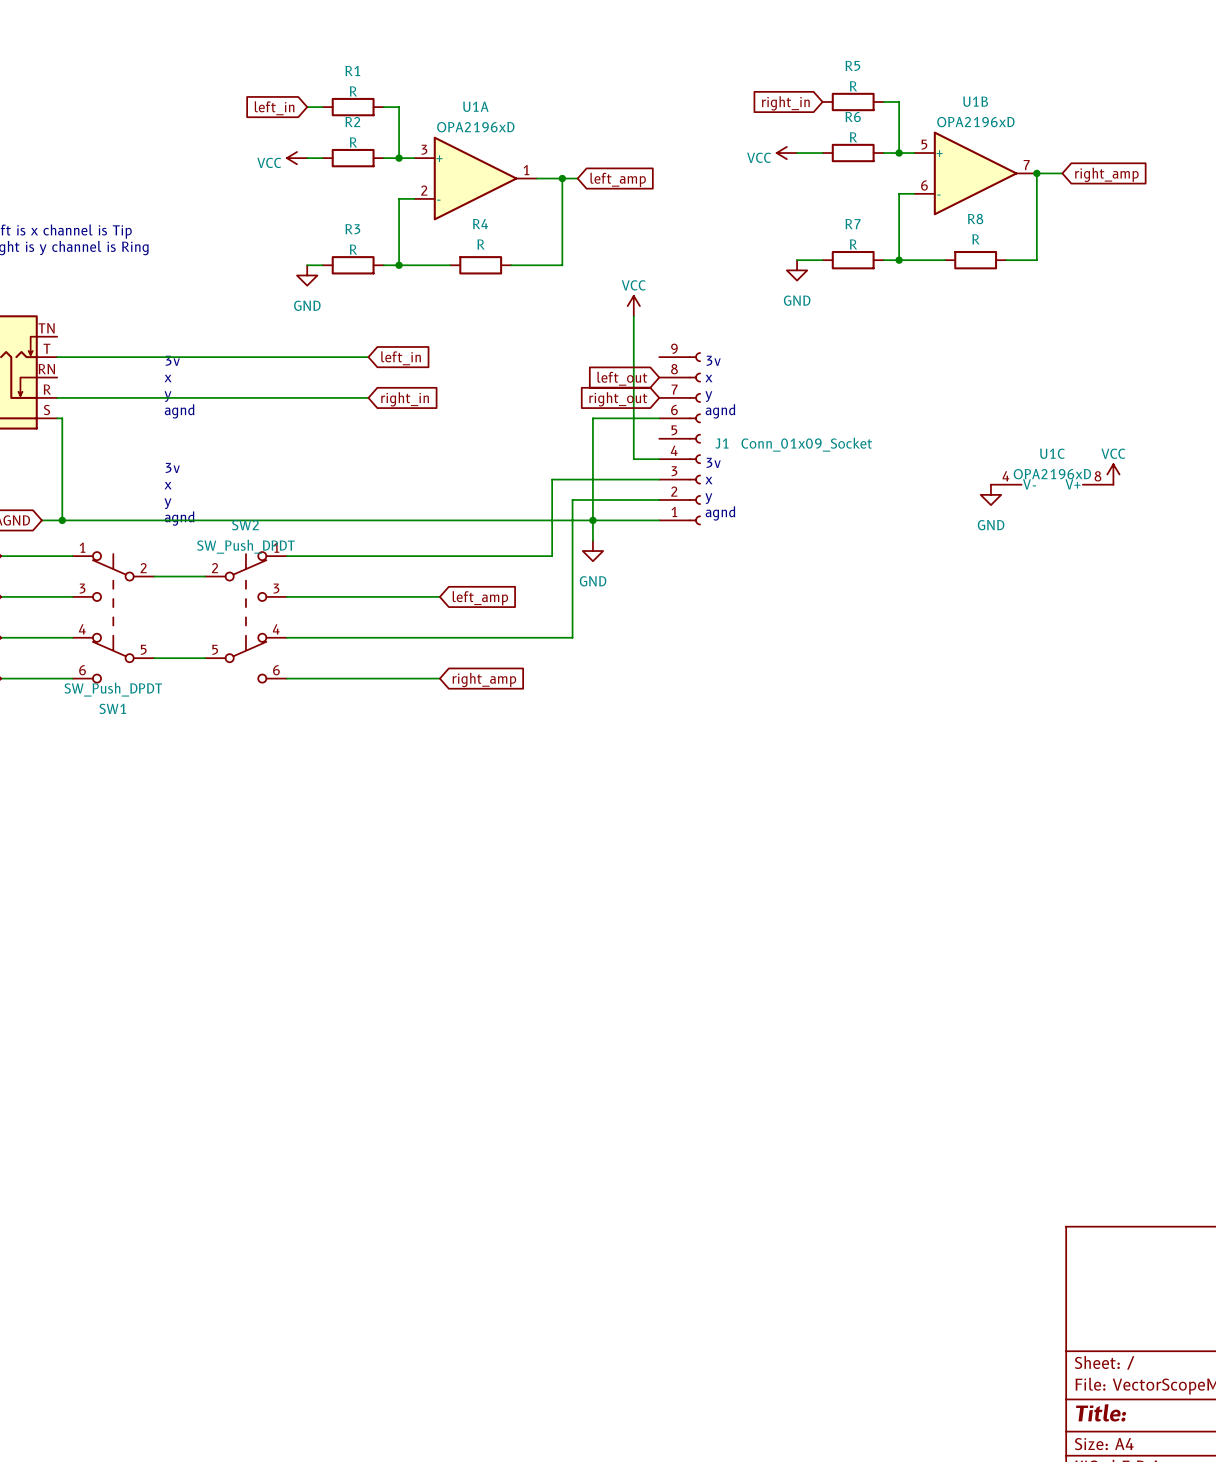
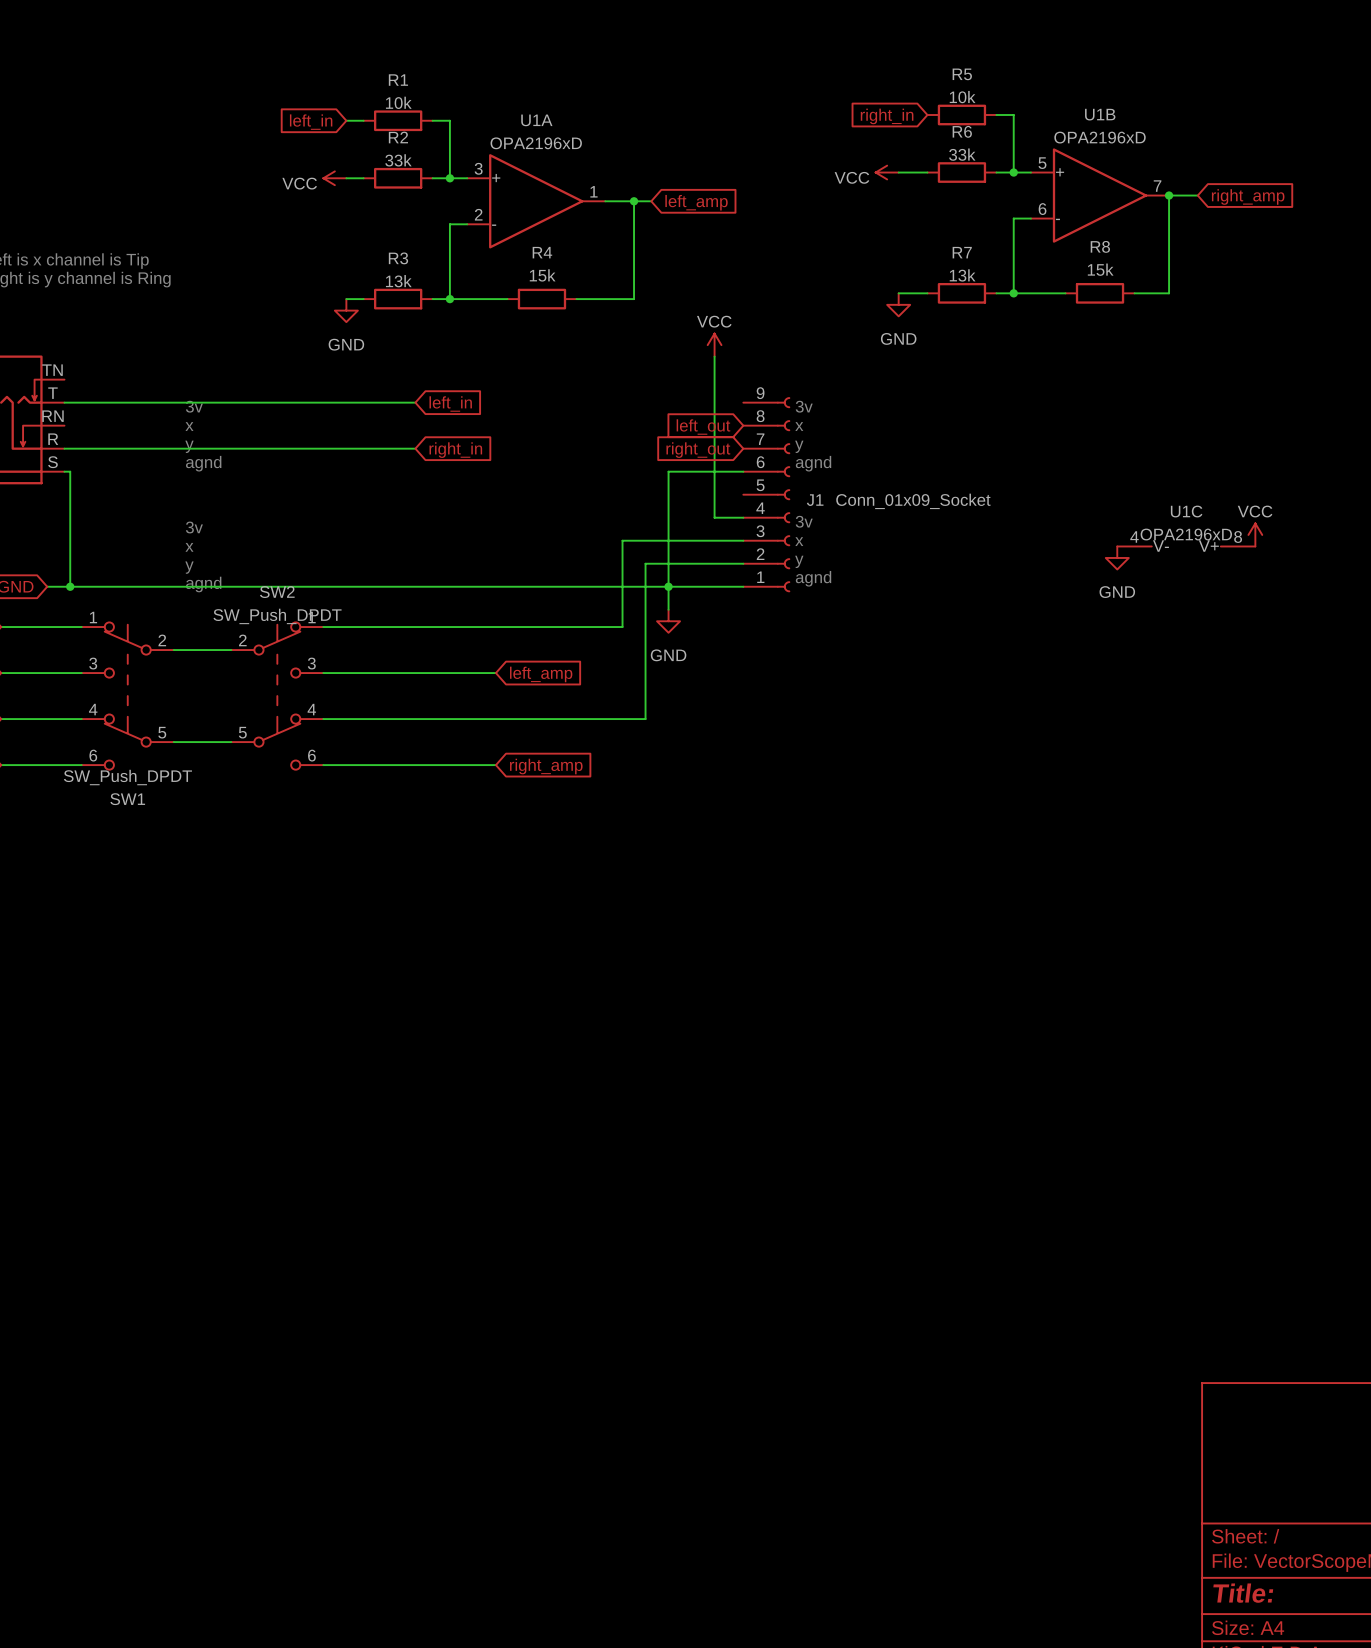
R5 value: R (853, 86) -> 10k (962, 97)
R1 value: R (353, 91) -> 10k (398, 102)
R6 value: R (853, 137) -> 33k (962, 154)
R2 value: R (353, 142) -> 33k (398, 160)
R8 value: R (975, 239) -> 15k (1100, 269)
R4 value: R (480, 244) -> 15k (542, 275)
R7 value: R (853, 244) -> 13k (962, 275)
R3 value: R (353, 249) -> 13k (398, 281)

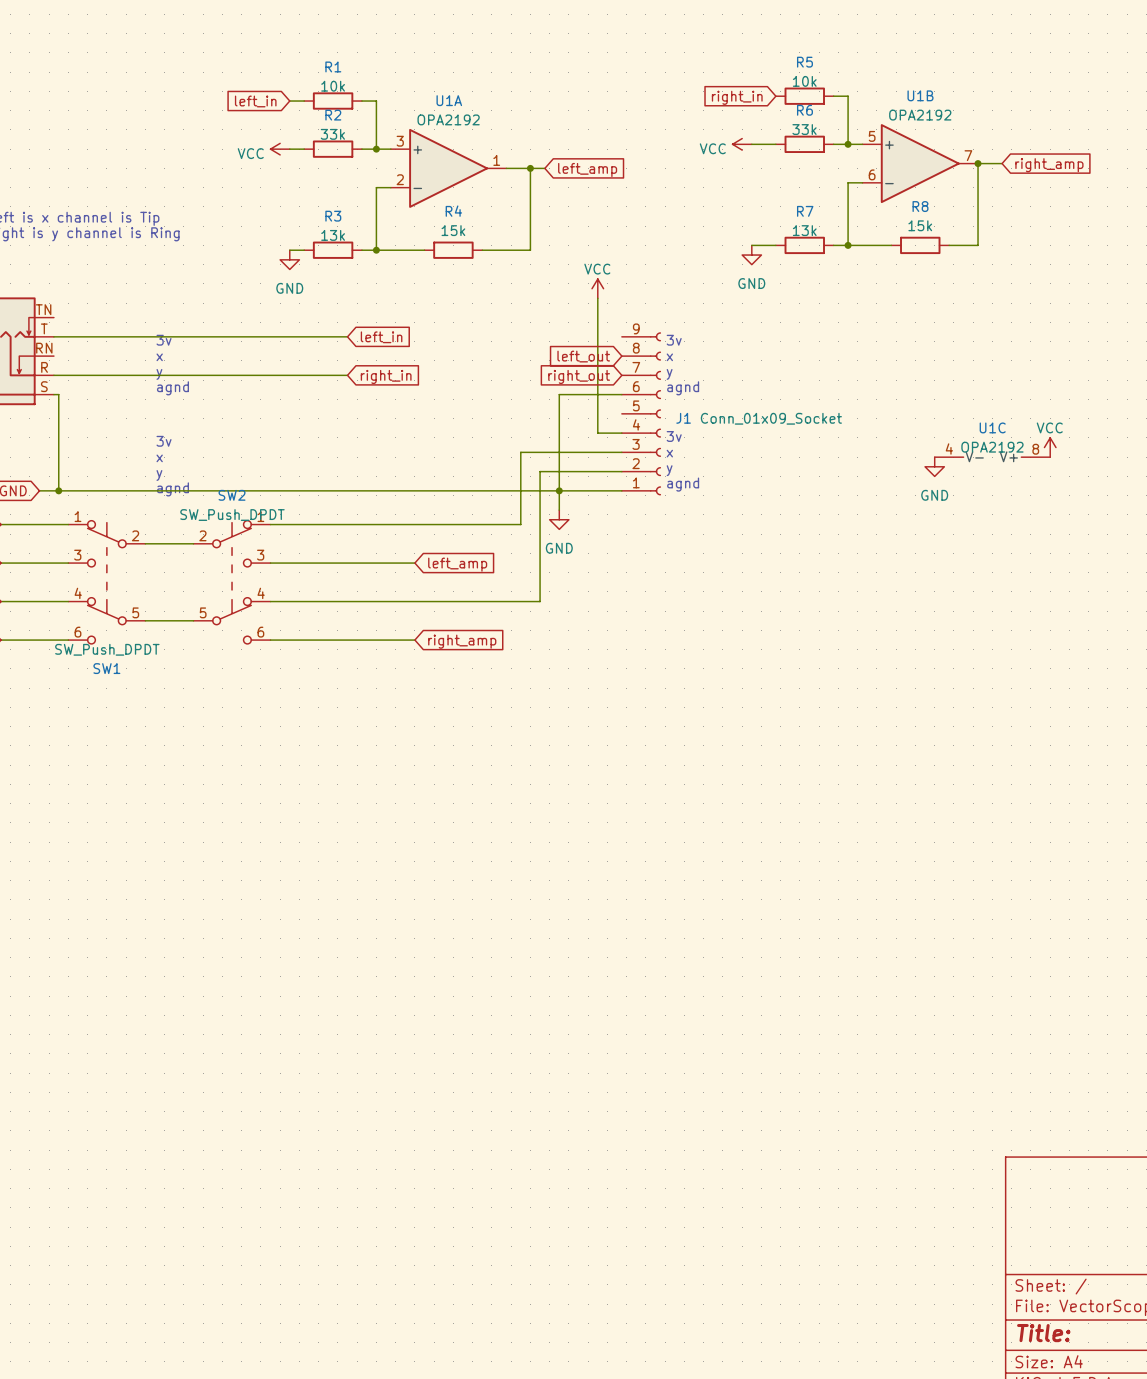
U1B value: OPA2196xD (1100, 137) -> OPA2192 (920, 115)
U1A value: OPA2196xD (536, 143) -> OPA2192 (448, 119)
U1C value: OPA2196xD (1186, 534) -> OPA2192 (992, 447)

